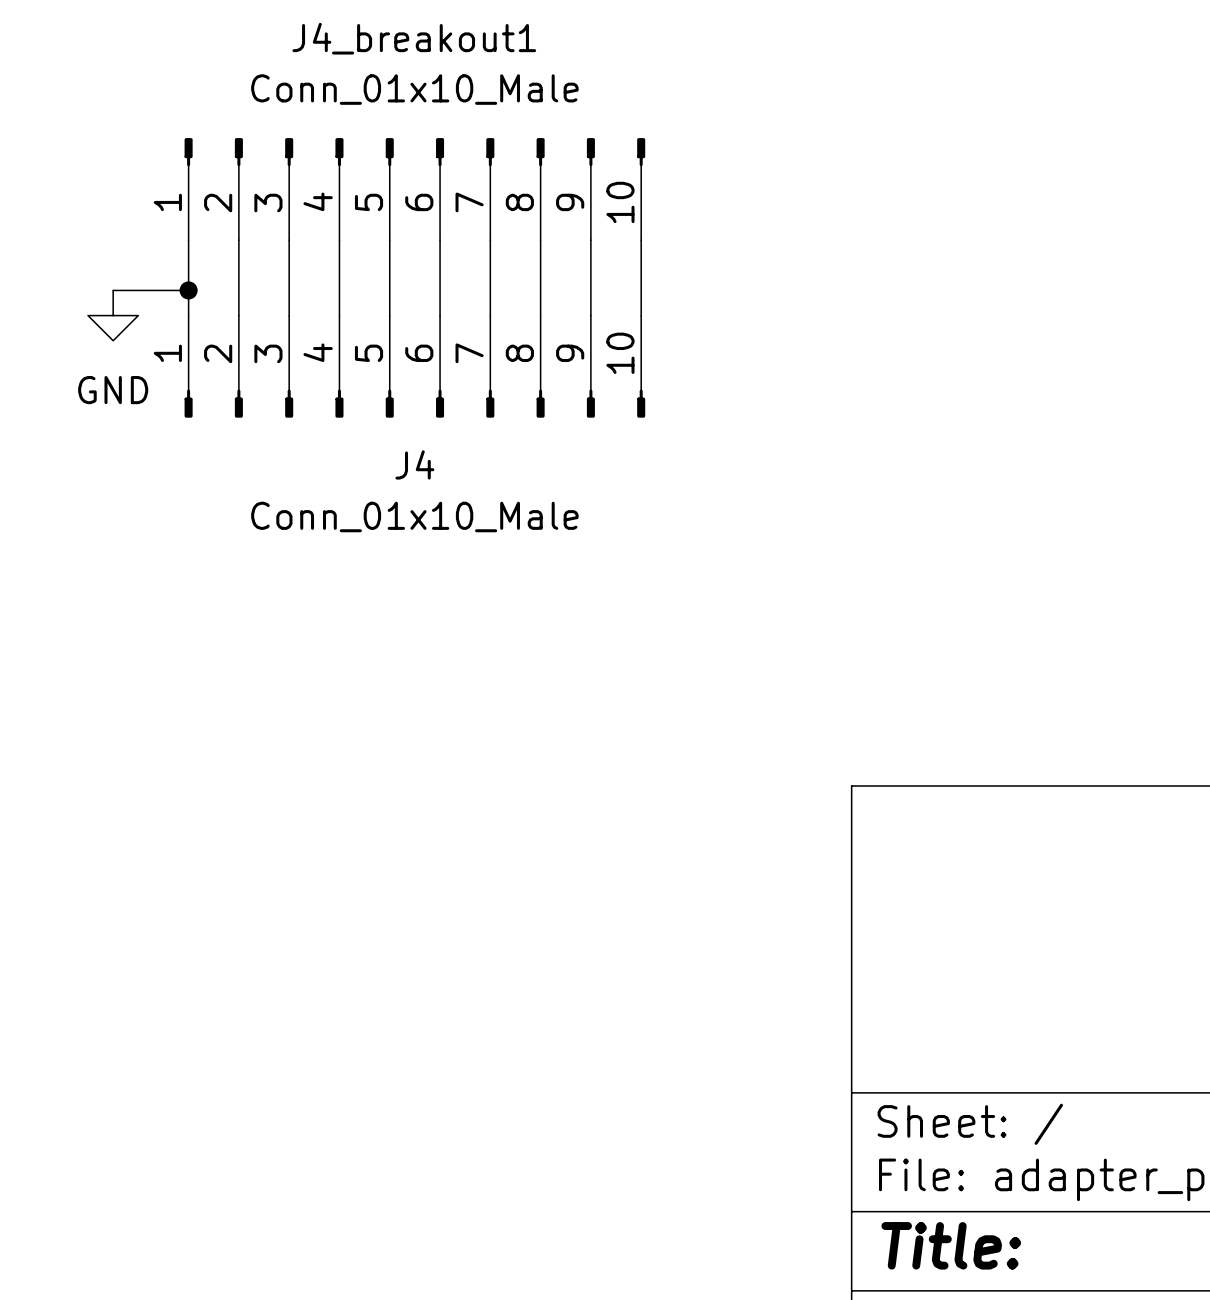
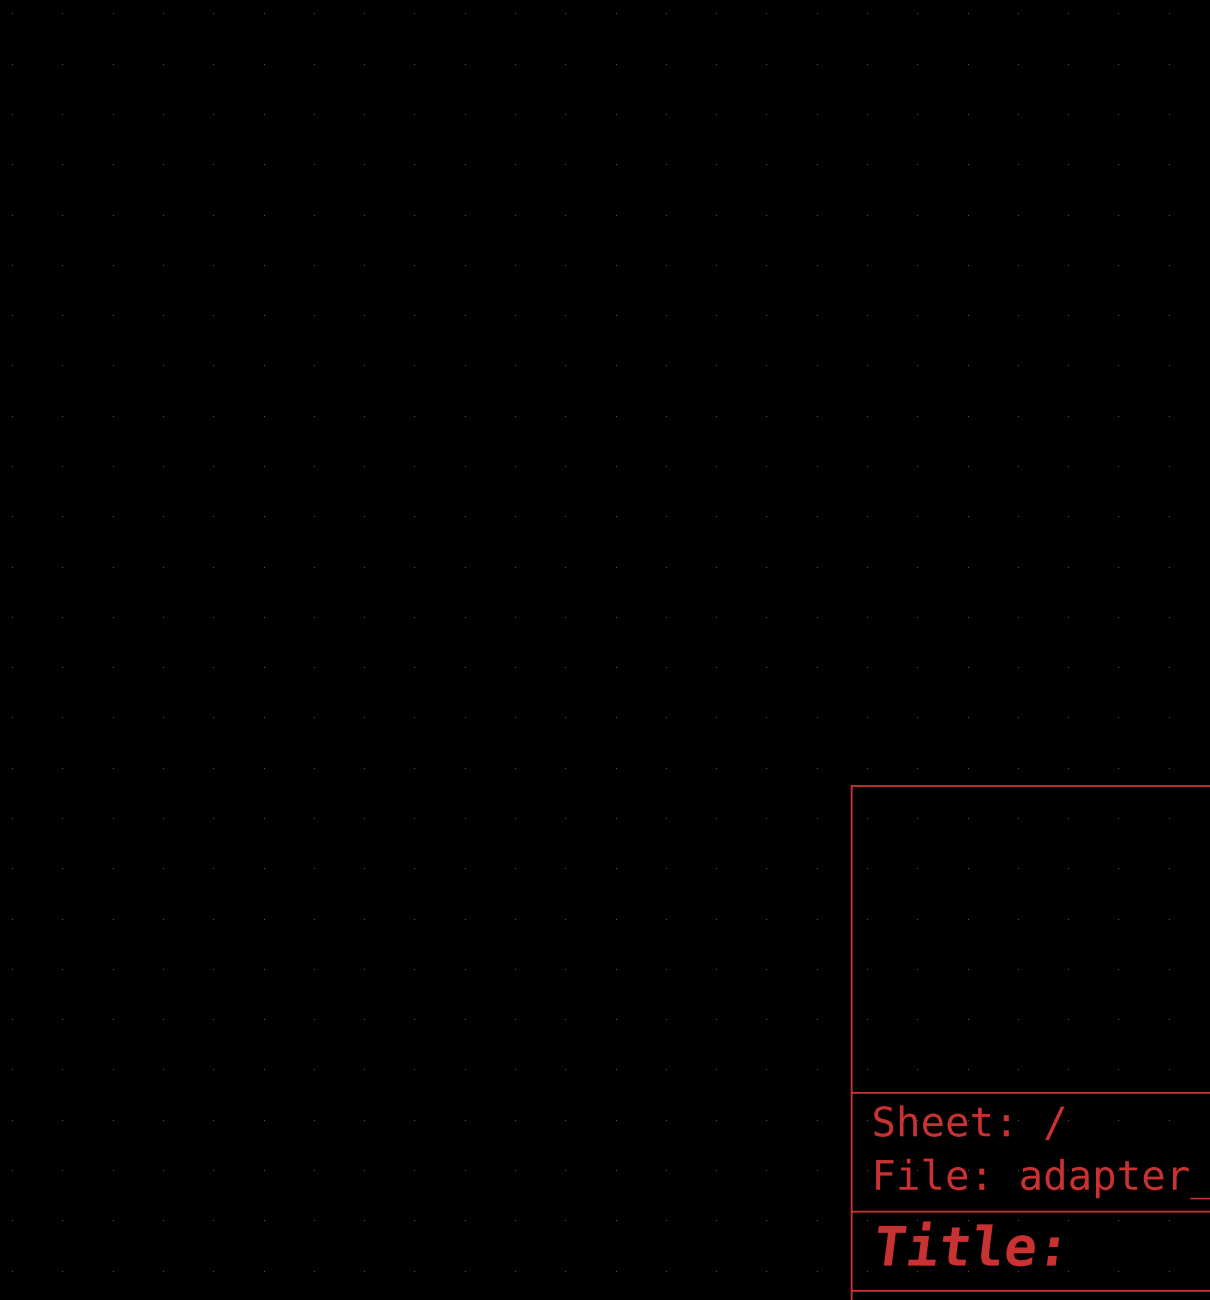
J4_breakout1: Conn_01x10_Male (414, 189) -> none
wire: (188, 240) (188, 315) -> none
wire: (238, 240) (238, 315) -> none
wire: (289, 240) (289, 315) -> none
wire: (339, 240) (339, 315) -> none
wire: (389, 240) (389, 315) -> none
wire: (440, 240) (440, 315) -> none
wire: (490, 240) (490, 315) -> none
wire: (540, 240) (540, 315) -> none
wire: (590, 240) (590, 315) -> none
wire: (641, 240) (641, 315) -> none
wire: (113, 290) (188, 290) -> none
junction: (188, 290) -> none
power symbol: GND (113, 315) -> none
J4: Conn_01x10_Male (414, 366) -> none

